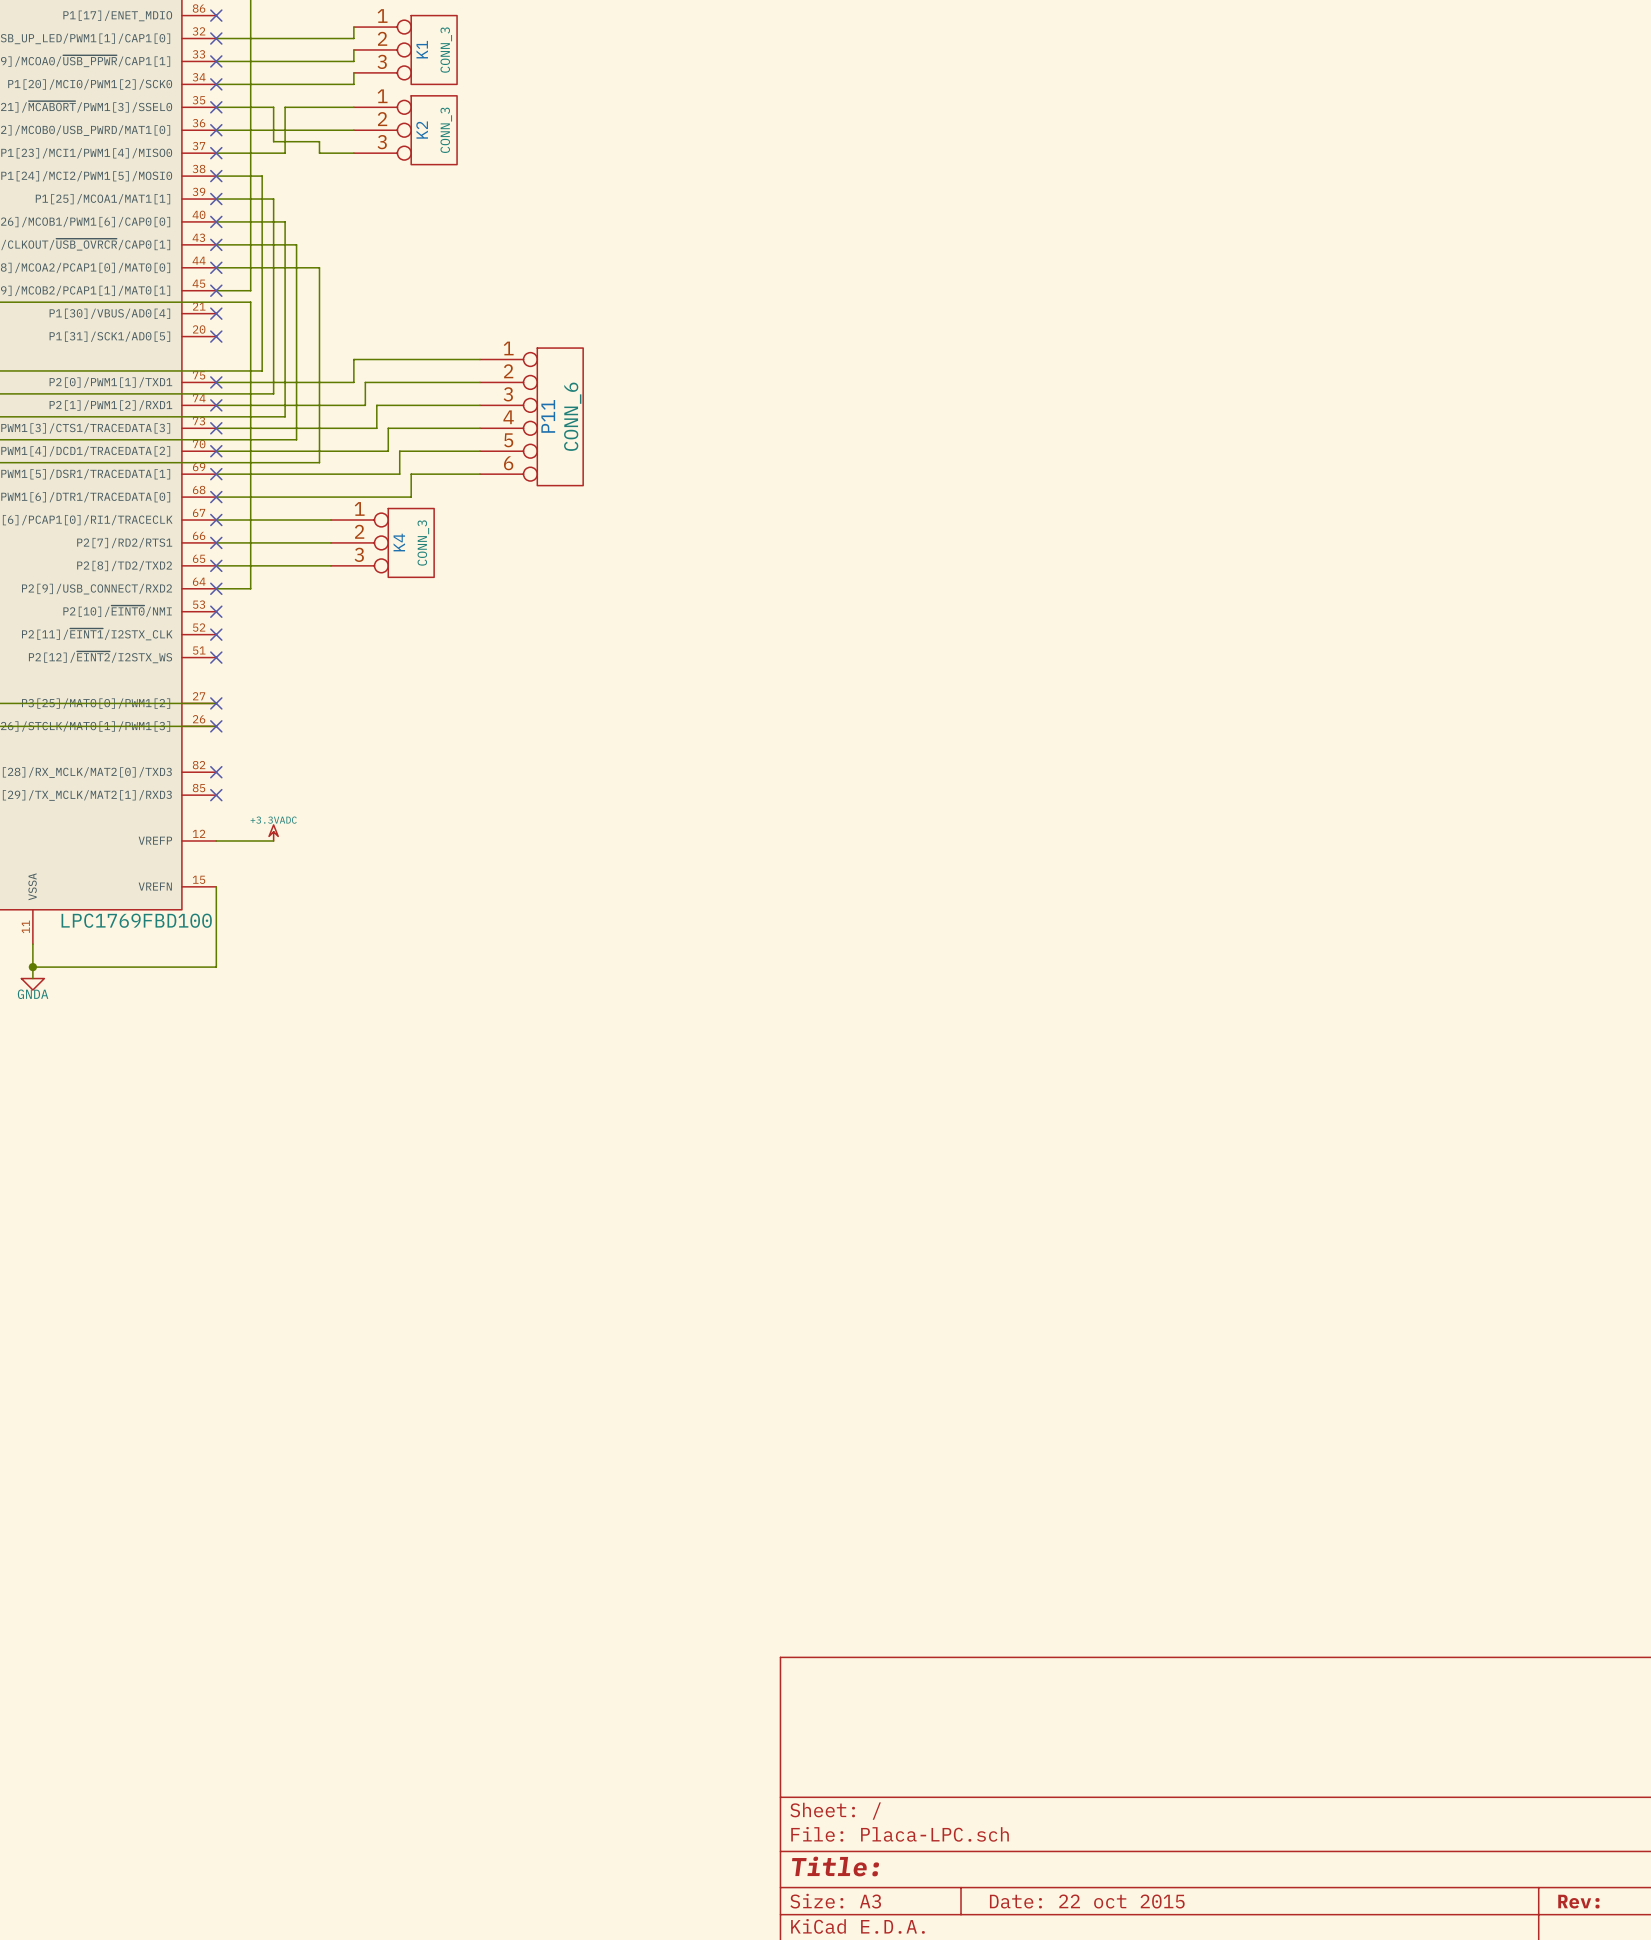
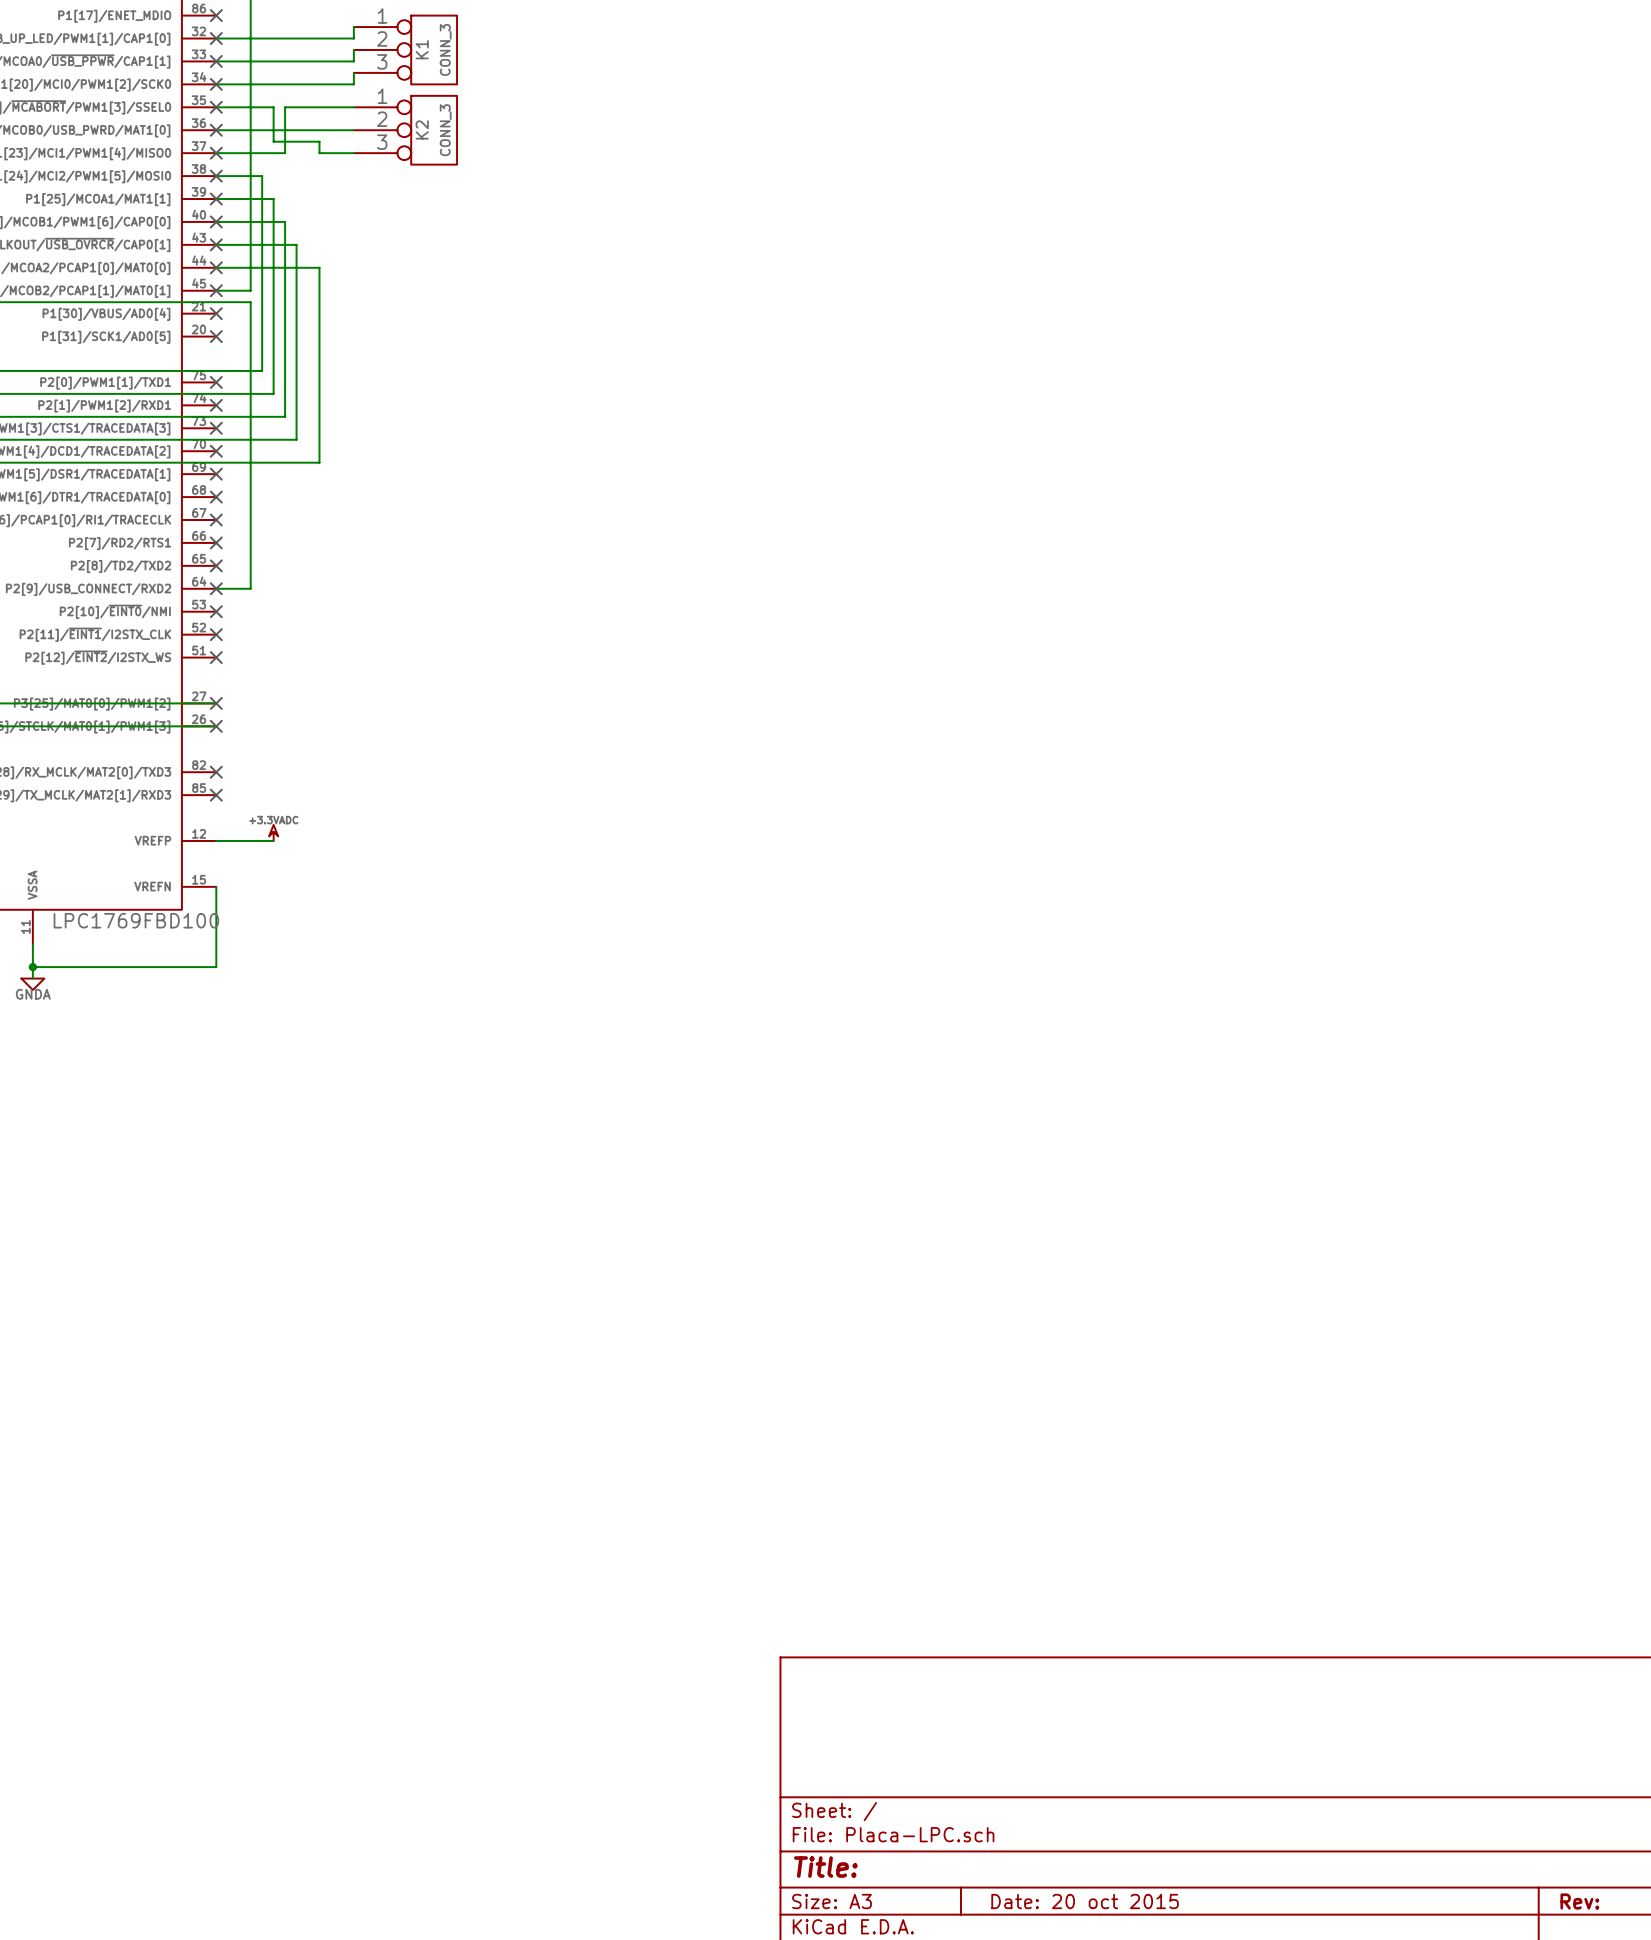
wire: (479, 359) (353, 359) (353, 382) (216, 382) -> none
wire: (479, 382) (365, 382) (365, 405) (216, 405) -> none
wire: (479, 405) (376, 405) (376, 428) (216, 428) -> none
P11: CONN_6 (531, 416) -> none
wire: (479, 428) (388, 428) (388, 451) (216, 451) -> none
wire: (479, 451) (399, 451) (399, 474) (216, 474) -> none
wire: (479, 474) (411, 474) (411, 497) (216, 497) -> none
wire: (216, 520) (330, 520) -> none
wire: (216, 542) (330, 542) -> none
K4: CONN_3 (382, 542) -> none
wire: (216, 565) (330, 565) -> none
title block: Date: 22 oct 2015 (1087, 1901) -> Date: 20 oct 2015 (1085, 1901)

